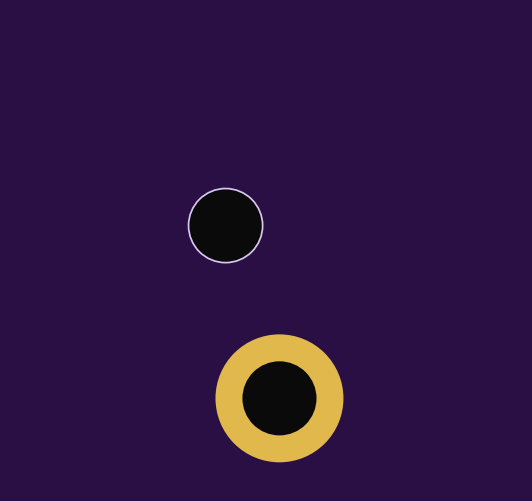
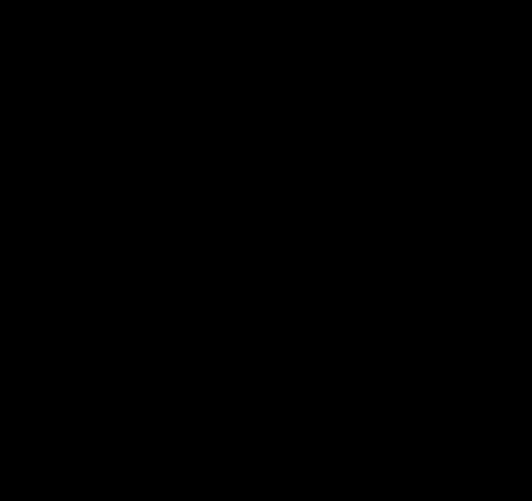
part: (225, 225) -> none
part: (279, 398) -> none

